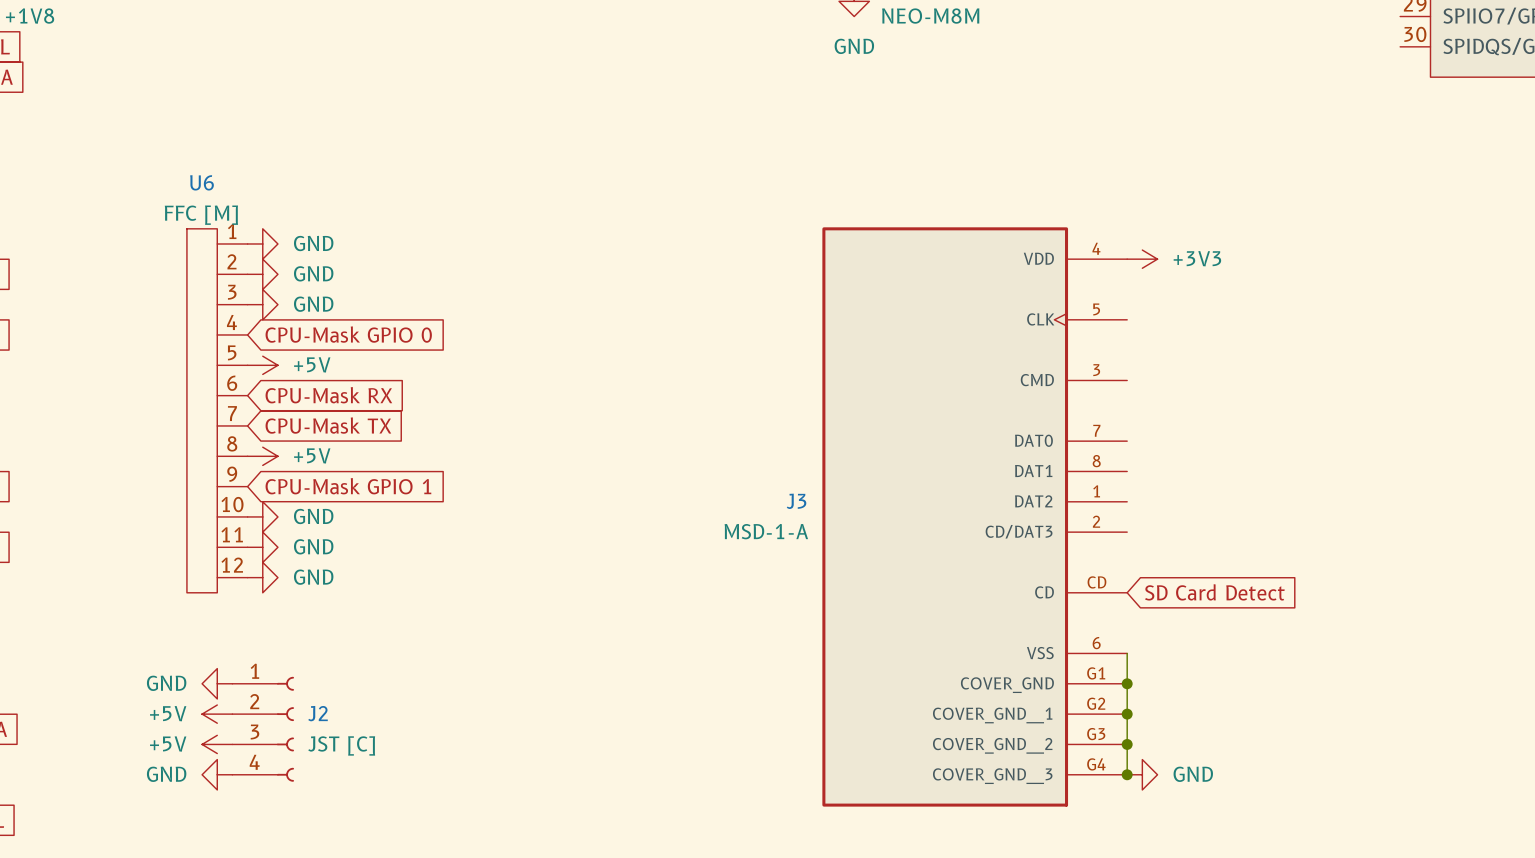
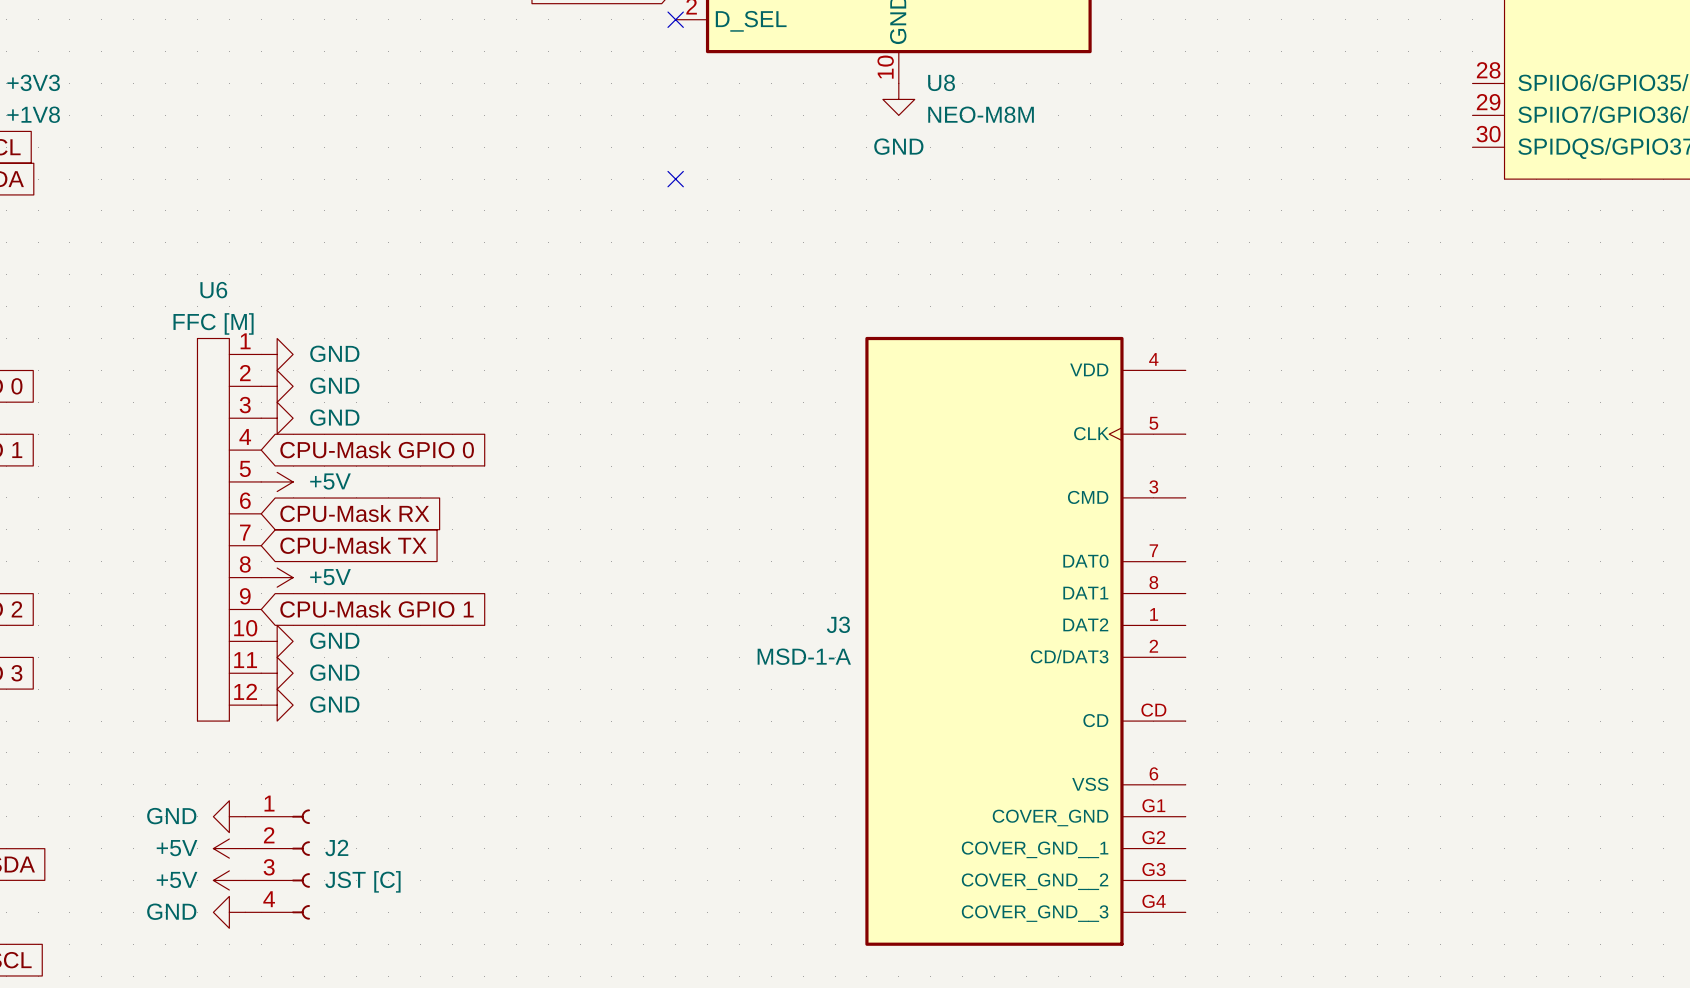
no-connect mark: none -> (675, 179)
power symbol: +3V3 (1142, 259) -> none
global label: SD Card Detect (1214, 592) -> none
wire: (1127, 653) (1127, 774) -> none
junction: (1127, 683) -> none
junction: (1127, 714) -> none
junction: (1127, 744) -> none
junction: (1127, 774) -> none
power symbol: GND (1142, 774) -> none

